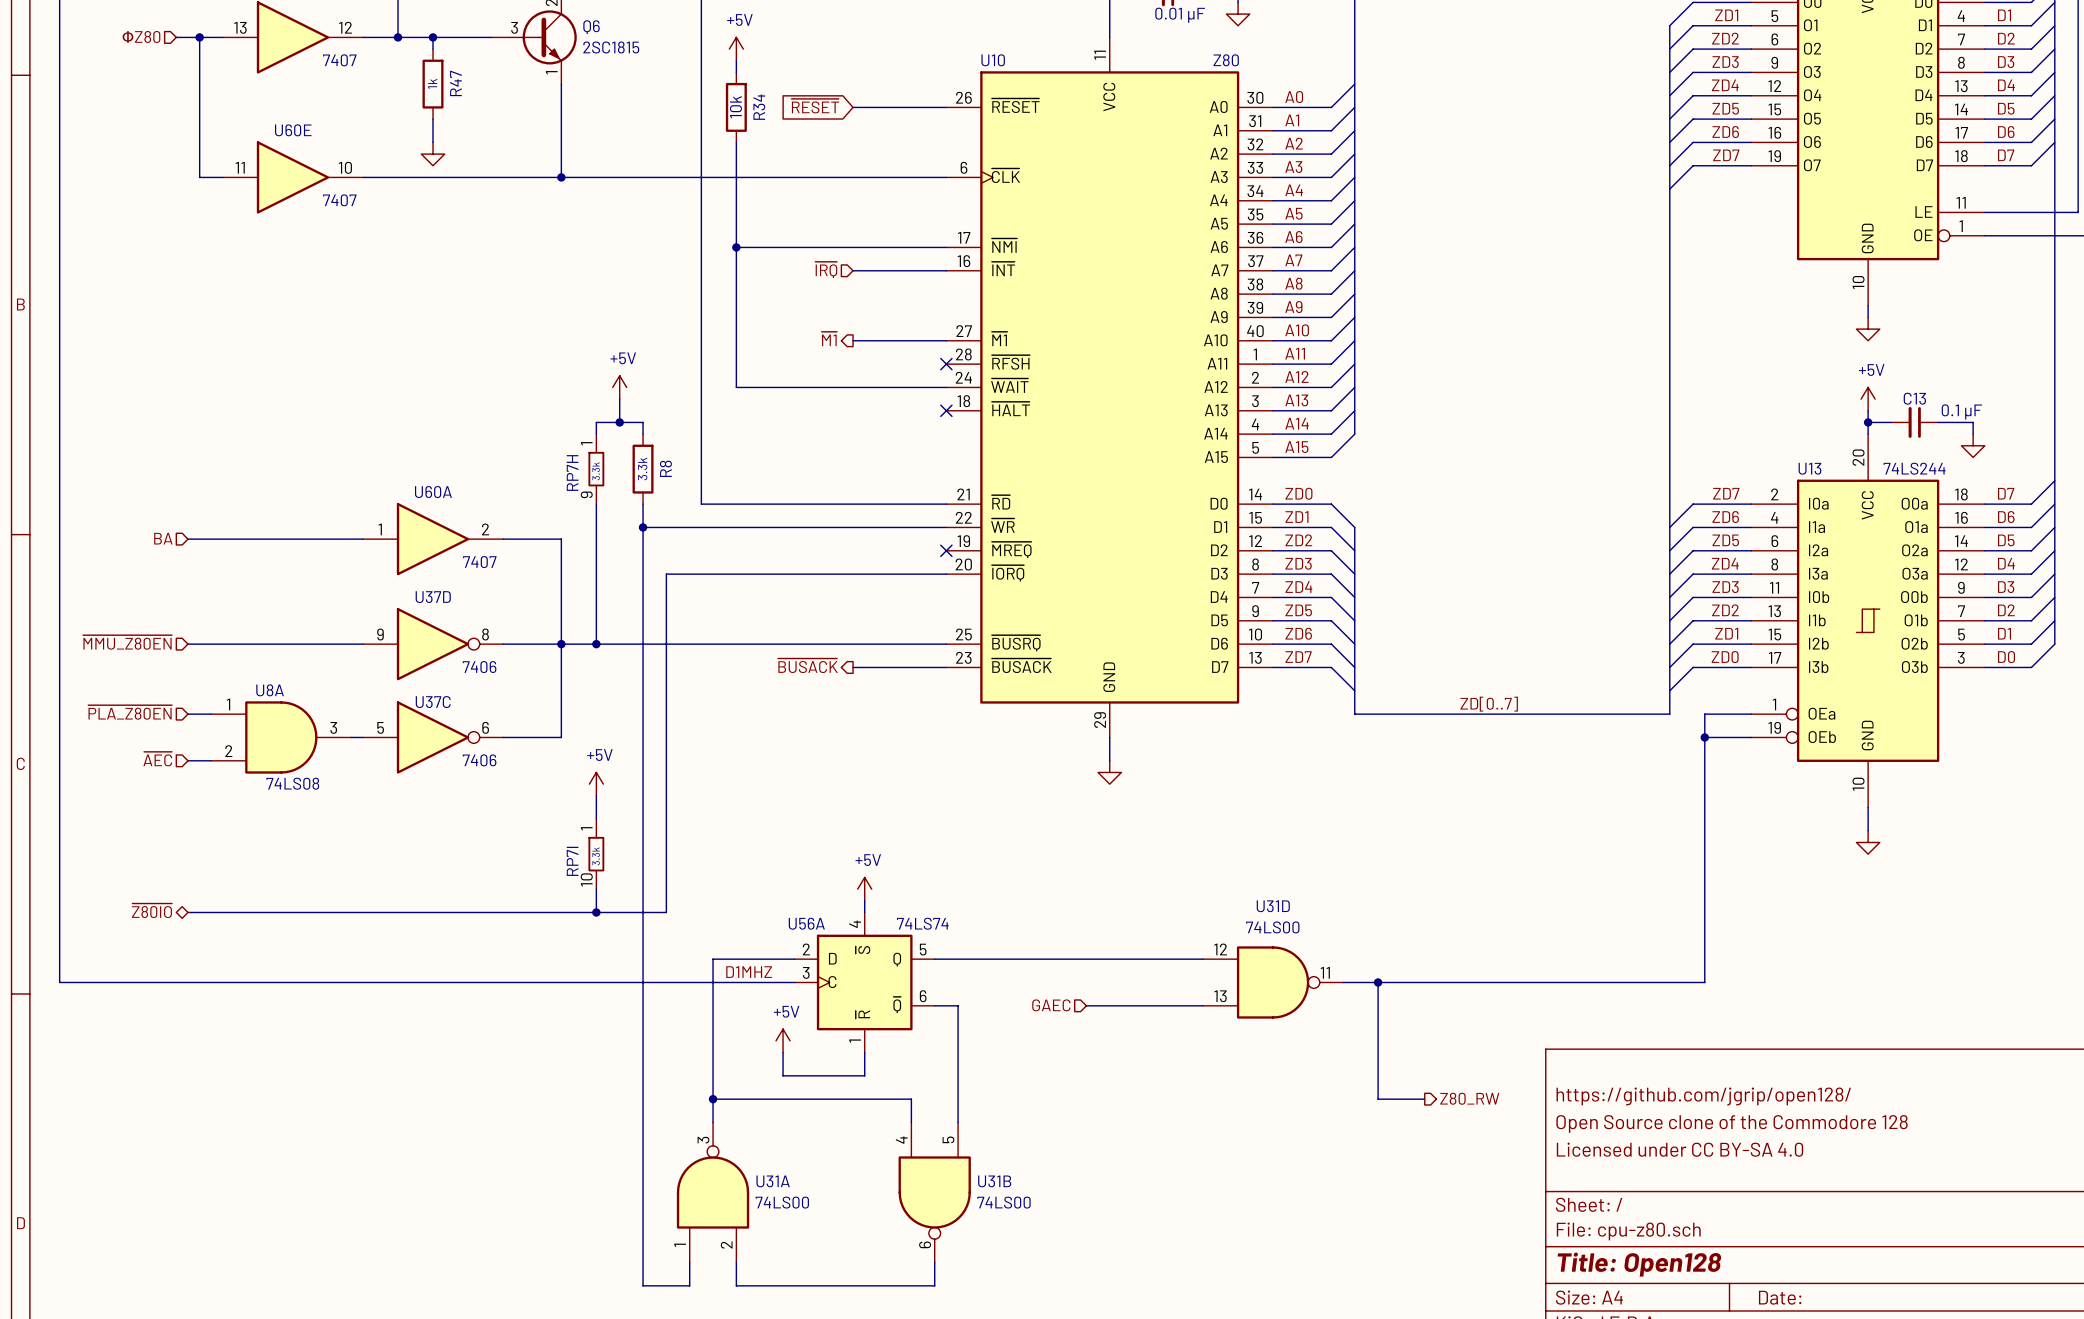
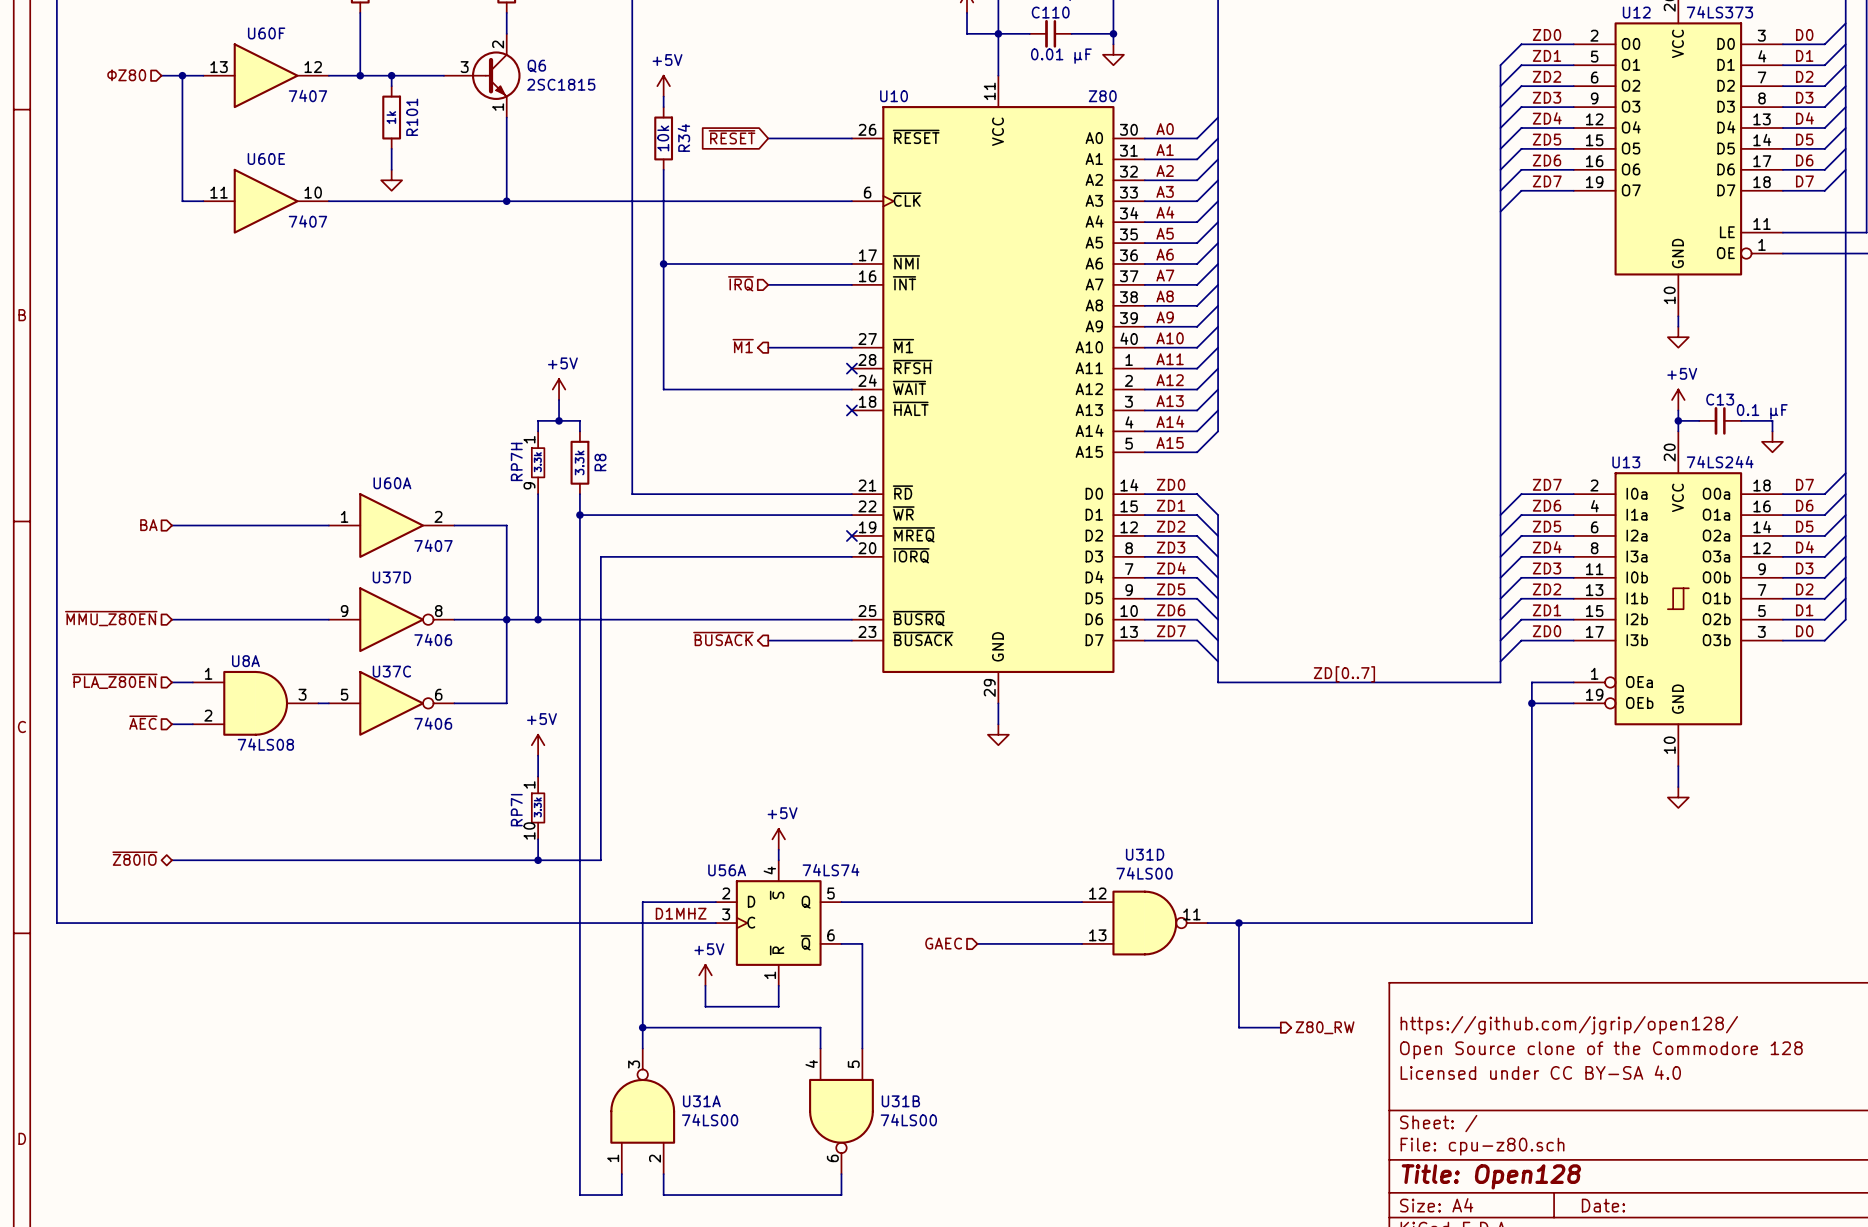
R47 name: R47 (455, 83) -> R101 (412, 117)

